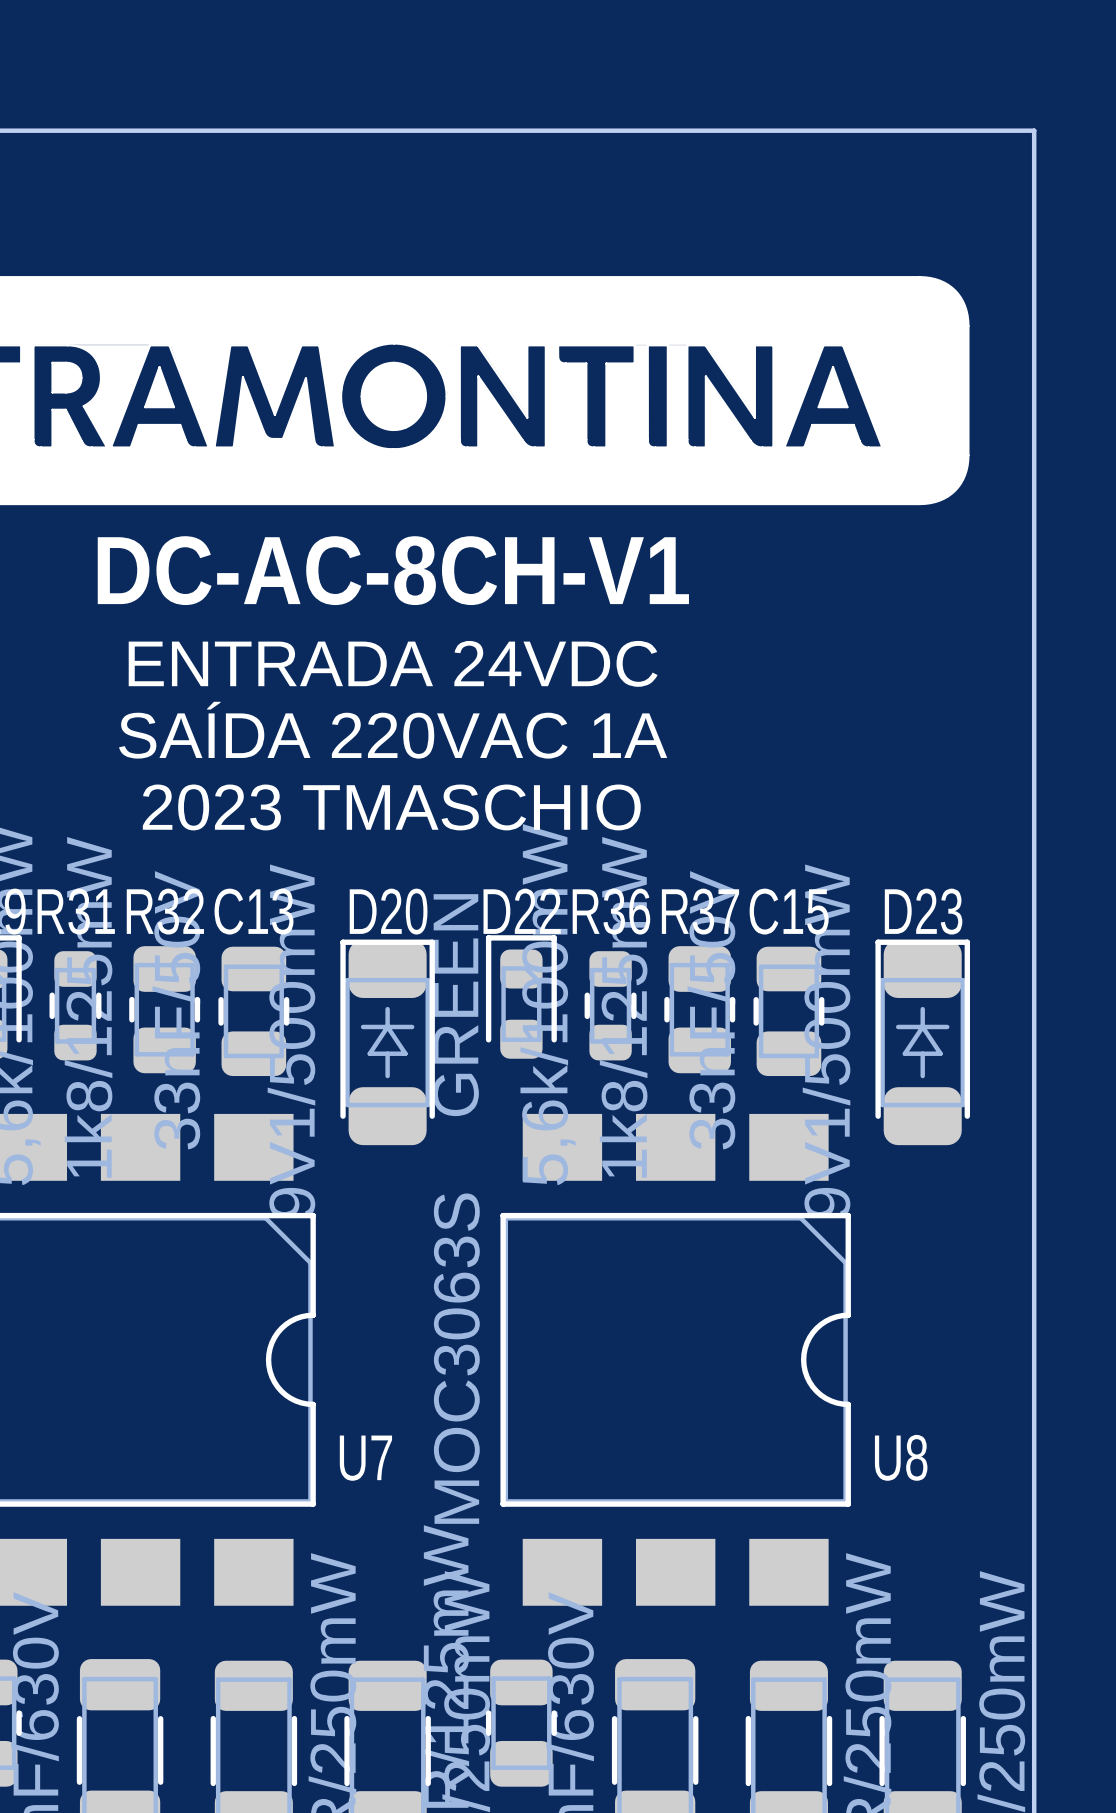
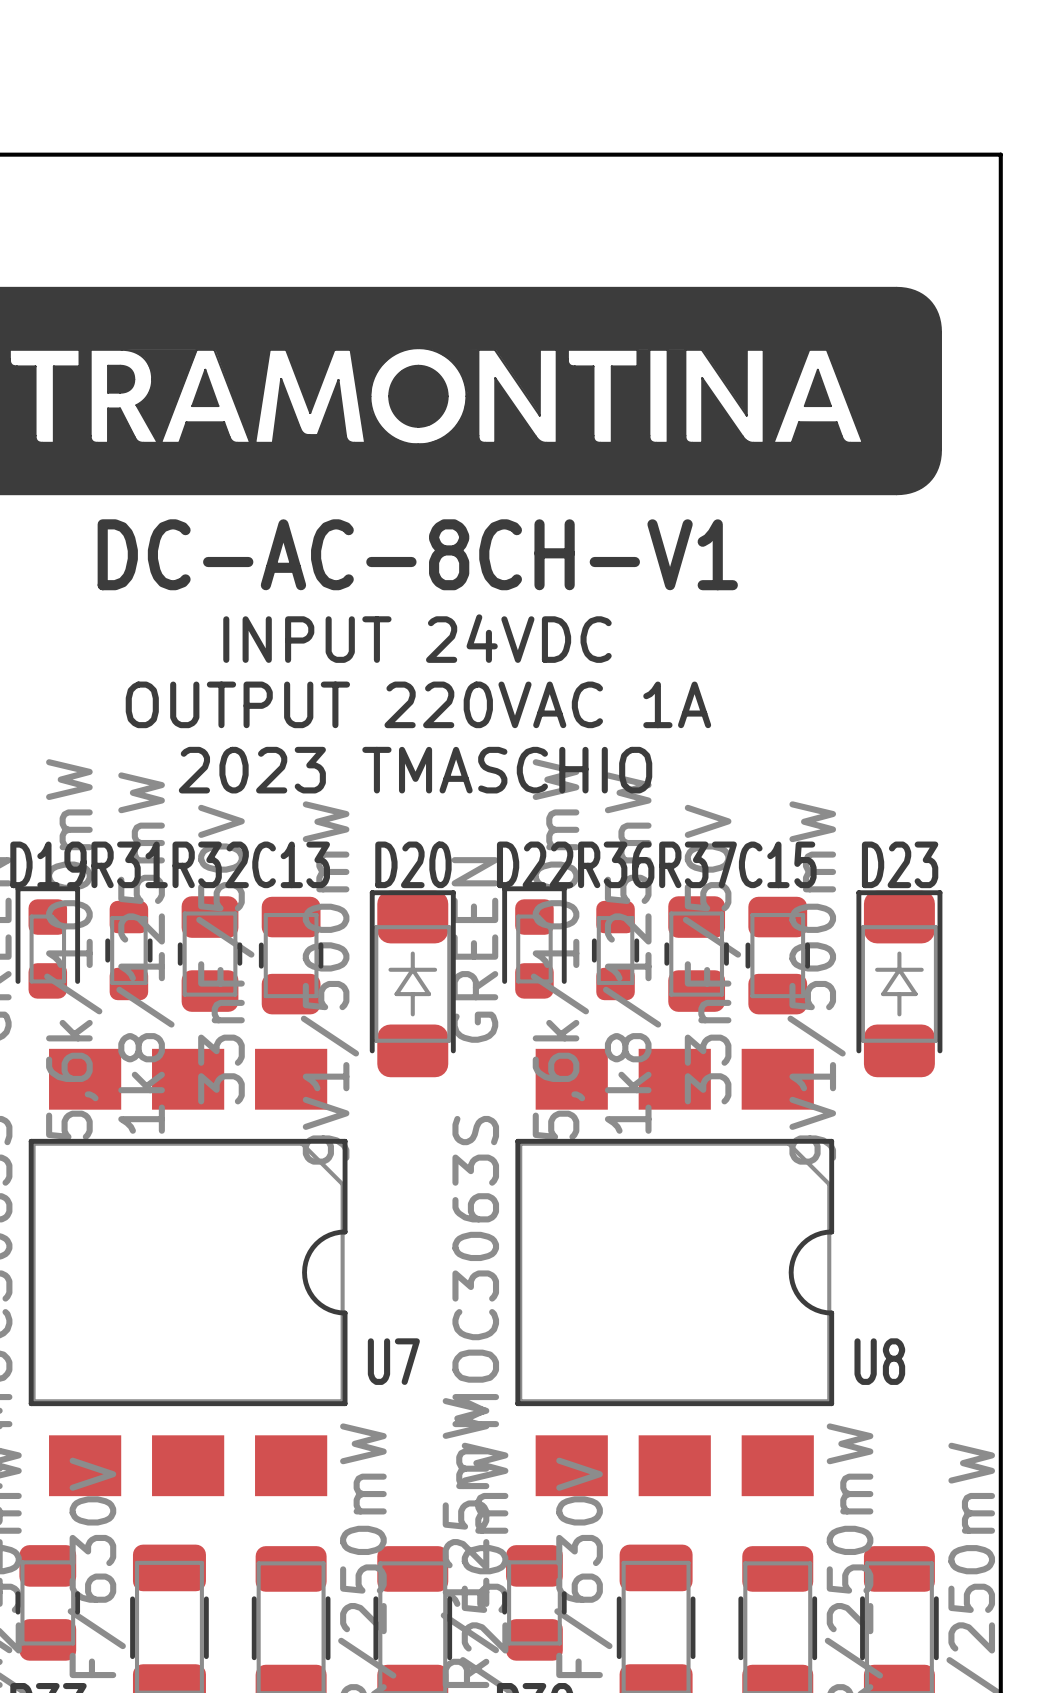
text: ENTRADA 24VDC (393, 663) -> INPUT 24VDC (417, 638)
text: SAÍDA 220VAC 1A (393, 730) -> OUTPUT 220VAC 1A (418, 704)

